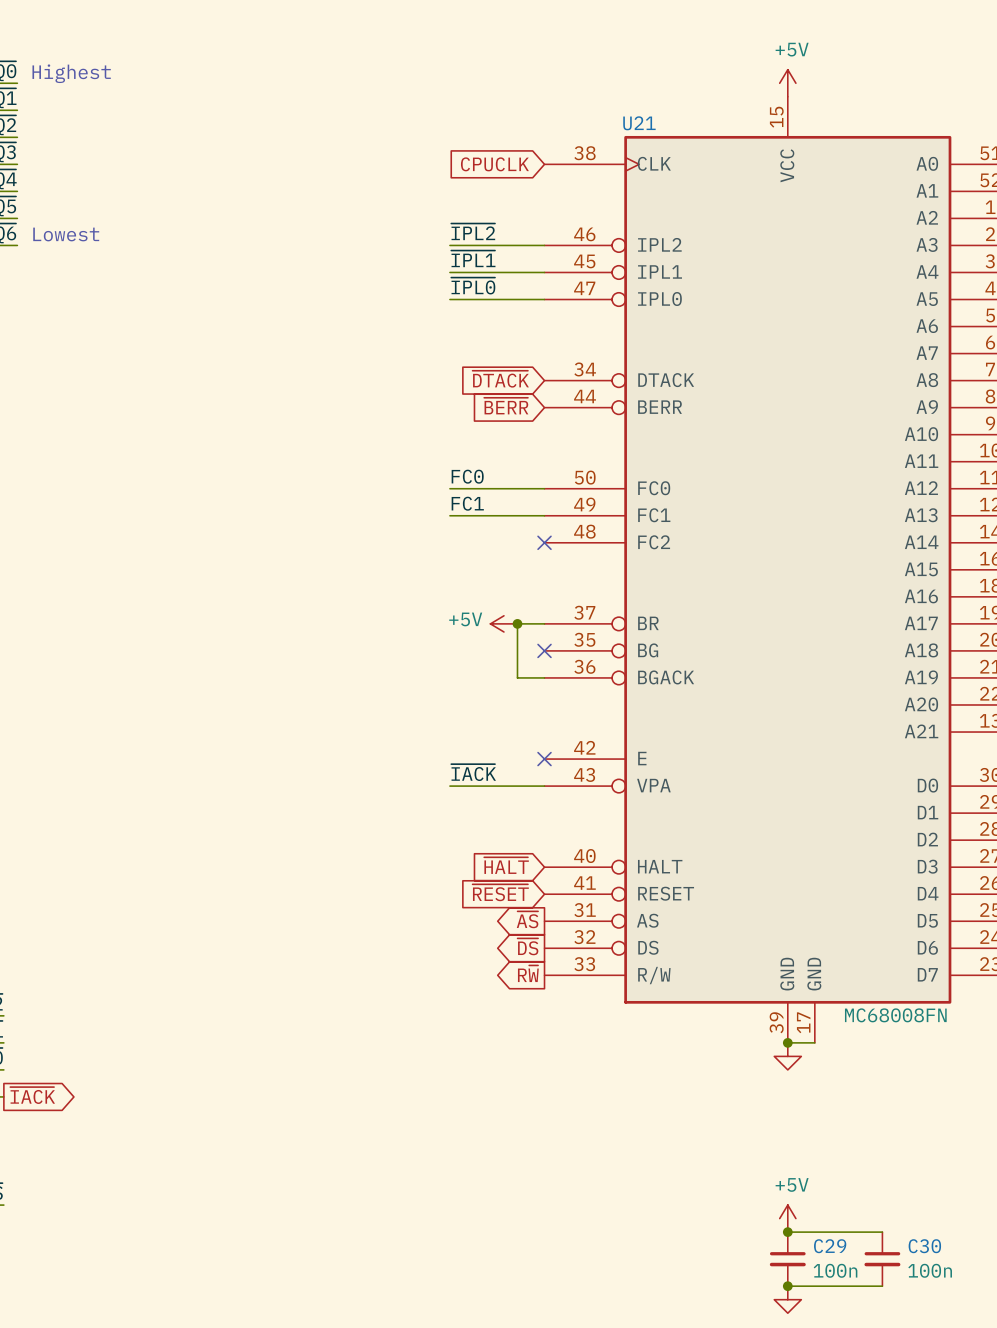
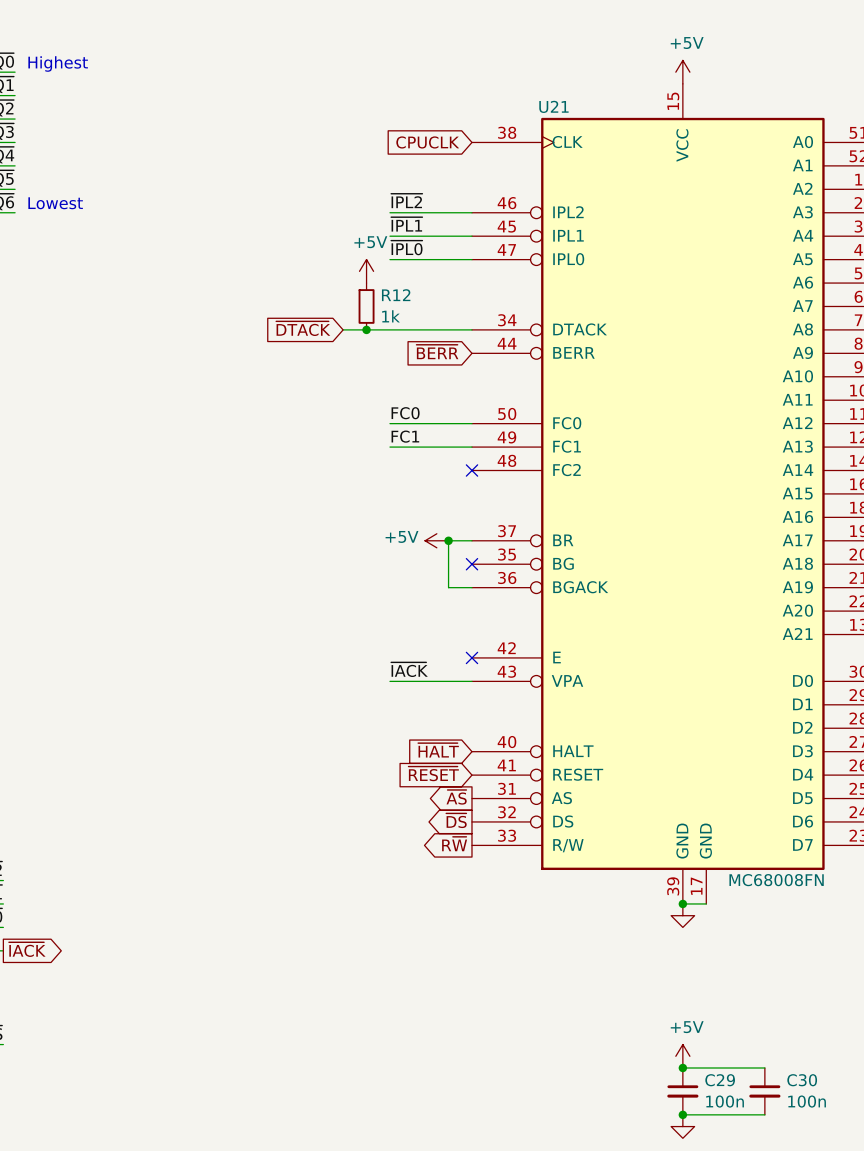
power symbol: none -> +5V (366, 271)
R12: none -> 1k (366, 306)
global label position: ~{DTACK} (500, 379) -> ~{DTACK} (303, 328)
wire: none -> (343, 329) (471, 329)
junction: none -> (366, 329)

